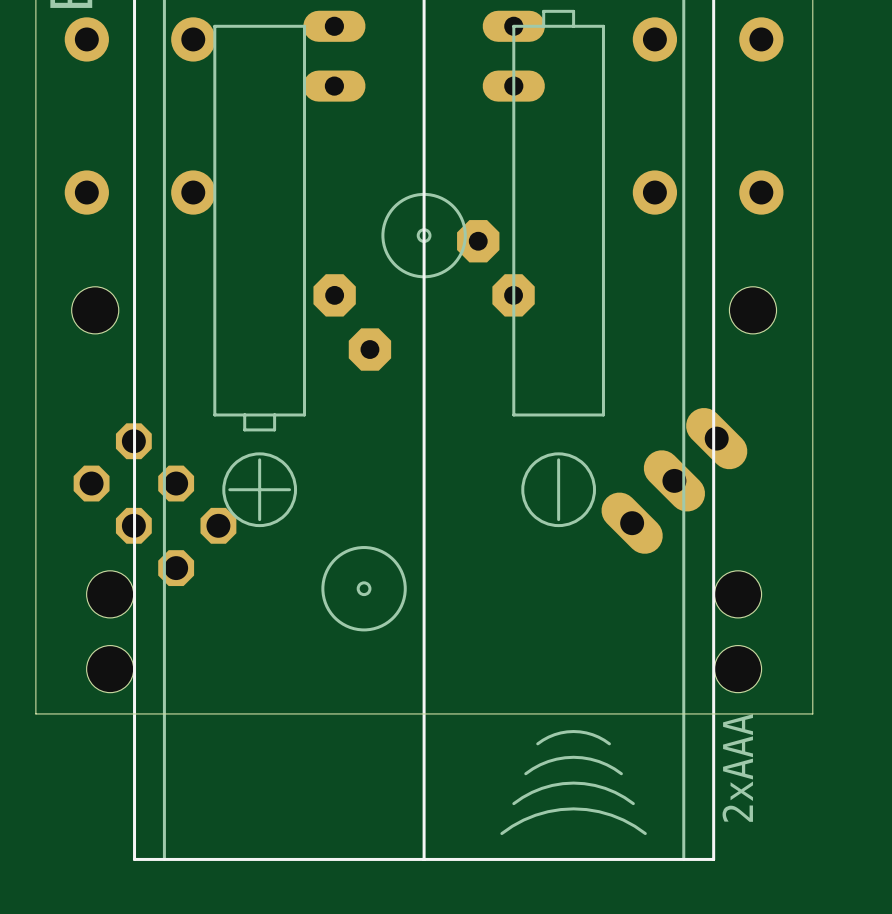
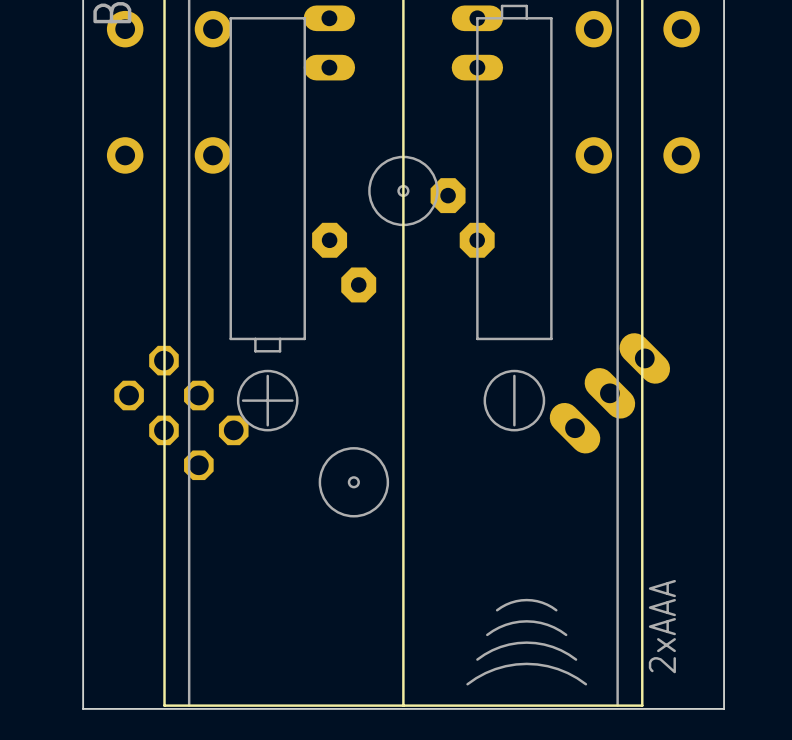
hole: (95, 310) -> none
hole: (752, 310) -> none
hole: (110, 594) -> none
hole: (738, 594) -> none
hole: (110, 669) -> none
hole: (738, 669) -> none
board edge: (812, 713) (35, 713) -> (724, 585) (724, 708) (83, 708) (83, 585)

